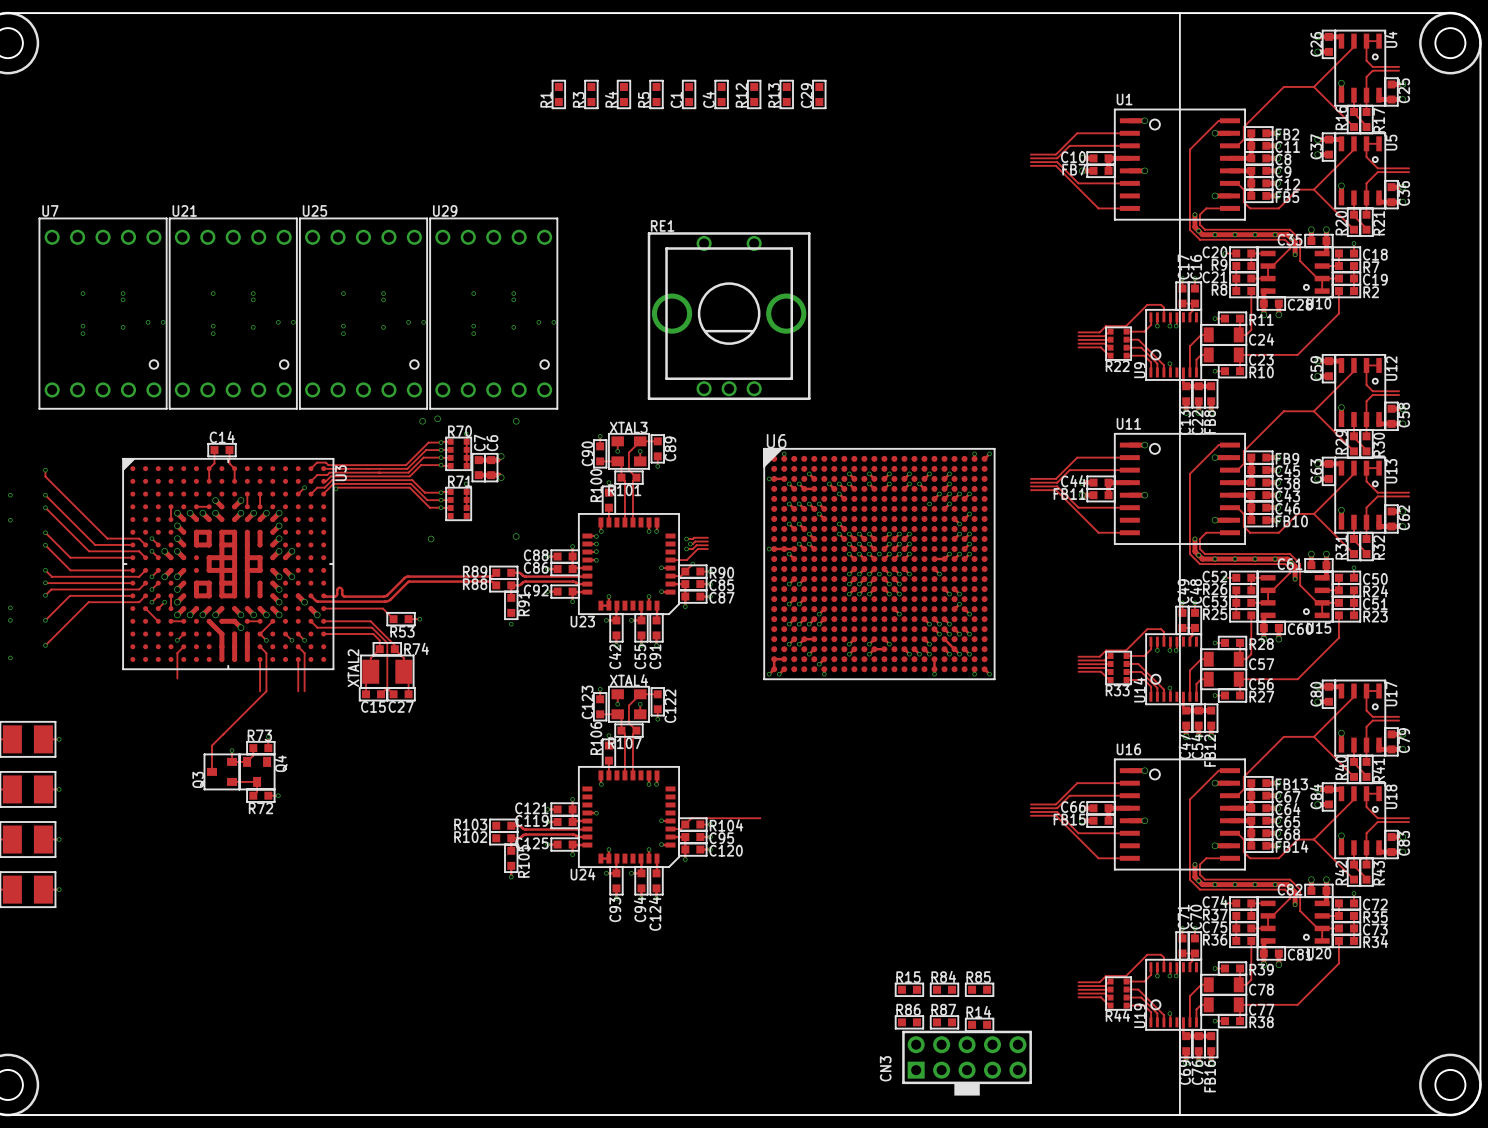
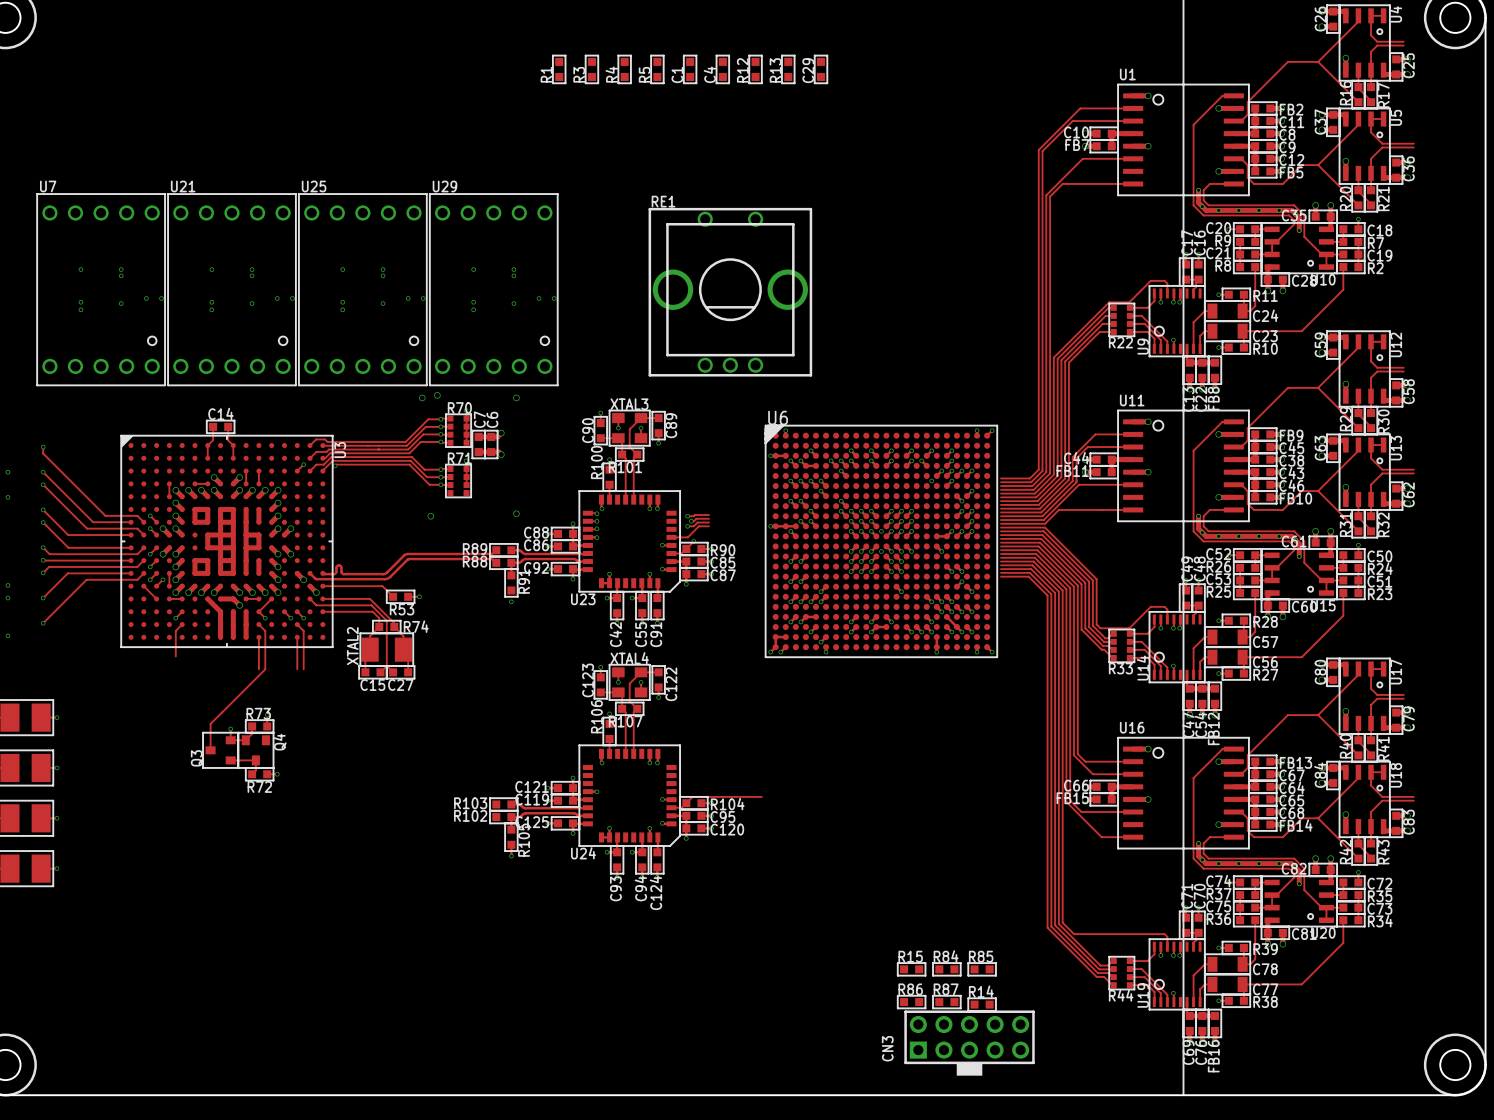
track: (1030, 154) (1055, 154) -> (1000, 478) (1029, 478) (1038, 469) (1038, 149) (1058, 129)
track: (1030, 158) (1057, 158) -> (1000, 482) (1031, 482) (1042, 470) (1042, 151) (1060, 133)
track: (1030, 162) (1057, 162) (1079, 183) -> (1000, 486) (1032, 486) (1046, 472) (1046, 195) (1082, 158)
track: (1030, 165) (1055, 165) (1098, 208) -> (1000, 489) (1033, 489) (1050, 473) (1050, 196) (1062, 183) (1101, 183)
track: (1109, 331) (1104, 336) (1078, 336) -> (1112, 307) (1108, 307) (1057, 358) (1057, 475) (1036, 497) (1000, 497)
track: (1078, 332) (1099, 332) -> (1000, 493) (1034, 493) (1053, 474) (1053, 357) (1102, 308)
track: (1110, 339) (1078, 339) -> (1113, 315) (1105, 315) (1061, 360) (1061, 477) (1037, 501) (1000, 501)
track: (1078, 343) (1105, 343) (1109, 347) -> (1000, 504) (1038, 504) (1065, 478) (1065, 361) (1102, 323) (1112, 323)
track: (1078, 347) (1101, 347) (1109, 355) -> (1000, 508) (1040, 508) (1068, 479) (1068, 362) (1099, 331) (1112, 331)
track: (1092, 457) (1077, 457) (1055, 478) (1030, 478) -> (1095, 434) (1072, 457) (1072, 481) (1041, 512) (1000, 512)
track: (1084, 470) (1069, 470) (1057, 482) (1030, 482) -> (1087, 447) (1076, 458) (1076, 482) (1042, 516) (1000, 516)
track: (1030, 486) (1057, 486) (1078, 507) -> (1000, 520) (1043, 520) (1079, 484) (1081, 484)
track: (1030, 490) (1055, 490) (1098, 532) -> (1000, 523) (1045, 523) (1058, 509) (1101, 509)
track: (1106, 650) (1099, 656) (1078, 656) -> (1109, 628) (1100, 628) (1096, 624) (1096, 579) (1045, 527) (1000, 527)
track: (1078, 660) (1102, 660) -> (1000, 531) (1043, 531) (1092, 580) (1092, 625) (1105, 638)
track: (1078, 664) (1101, 664) -> (1000, 535) (1042, 535) (1089, 581) (1089, 627) (1104, 642)
track: (1078, 667) (1099, 667) -> (1000, 538) (1041, 538) (1085, 582) (1085, 628) (1102, 645)
track: (1078, 671) (1098, 671) -> (1000, 542) (1040, 542) (1081, 584) (1081, 629) (1101, 649)
track: (1082, 783) (1077, 783) (1055, 804) (1030, 804) -> (1085, 761) (1077, 754) (1077, 585) (1038, 546) (1000, 546)
track: (1089, 795) (1069, 795) (1057, 808) (1030, 808) -> (1092, 774) (1073, 755) (1073, 586) (1037, 550) (1000, 550)
track: (1030, 811) (1057, 811) (1067, 822) -> (1000, 554) (1036, 554) (1070, 587) (1070, 800)
track: (1030, 815) (1055, 815) (1063, 823) -> (1000, 557) (1034, 557) (1066, 589) (1066, 801)
track: (1147, 954) (1126, 976) (1106, 976) (1099, 982) (1078, 982) -> (1150, 934) (1073, 934) (1062, 922) (1062, 590) (1033, 561) (1000, 561)
track: (1078, 986) (1097, 986) -> (1000, 565) (1032, 565) (1058, 591) (1058, 924) (1100, 965)
track: (1078, 989) (1096, 989) -> (1000, 569) (1031, 569) (1055, 593) (1055, 925) (1099, 969)
track: (1078, 993) (1094, 993) -> (1000, 572) (1029, 572) (1051, 594) (1051, 926) (1097, 973)
track: (1078, 997) (1093, 997) -> (1000, 576) (1028, 576) (1047, 595) (1047, 927) (1096, 976)

